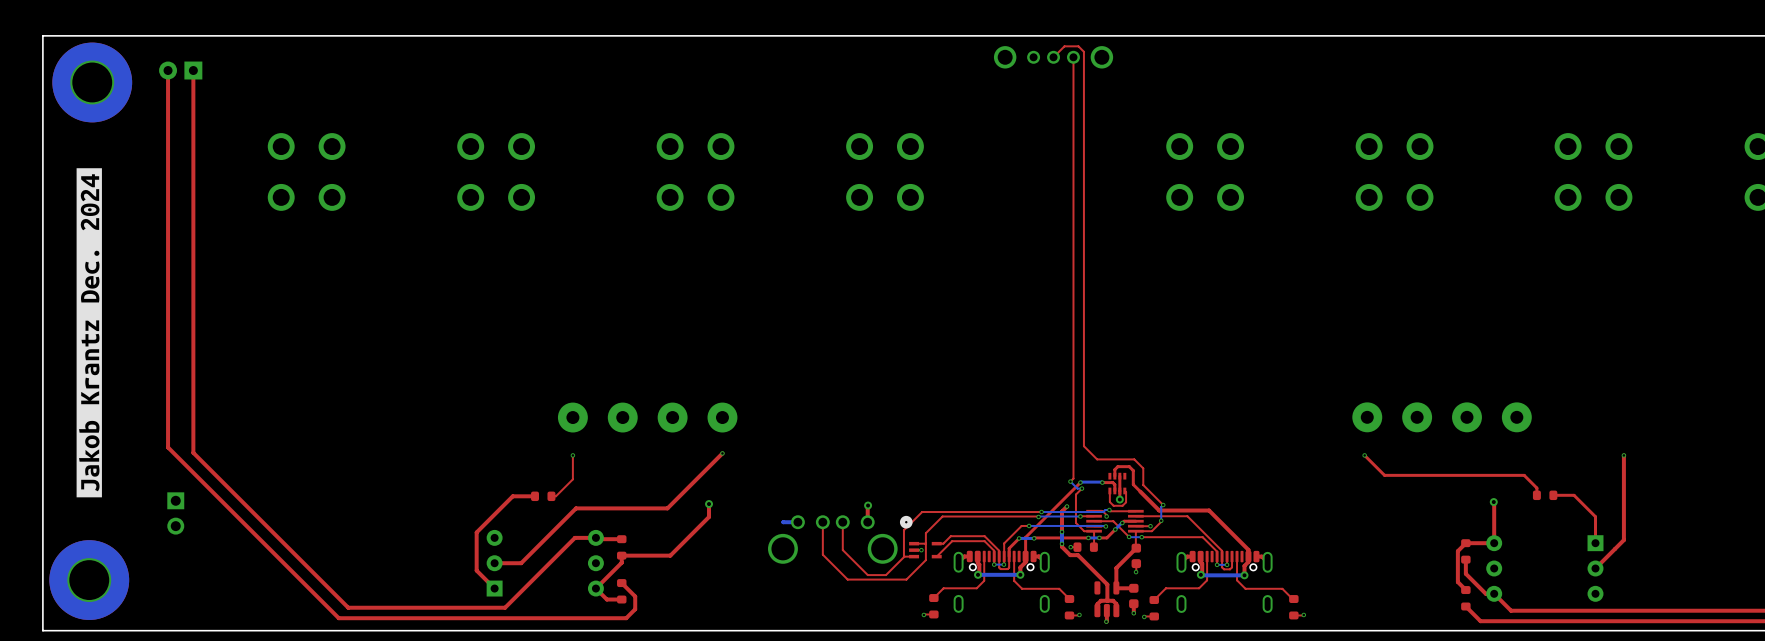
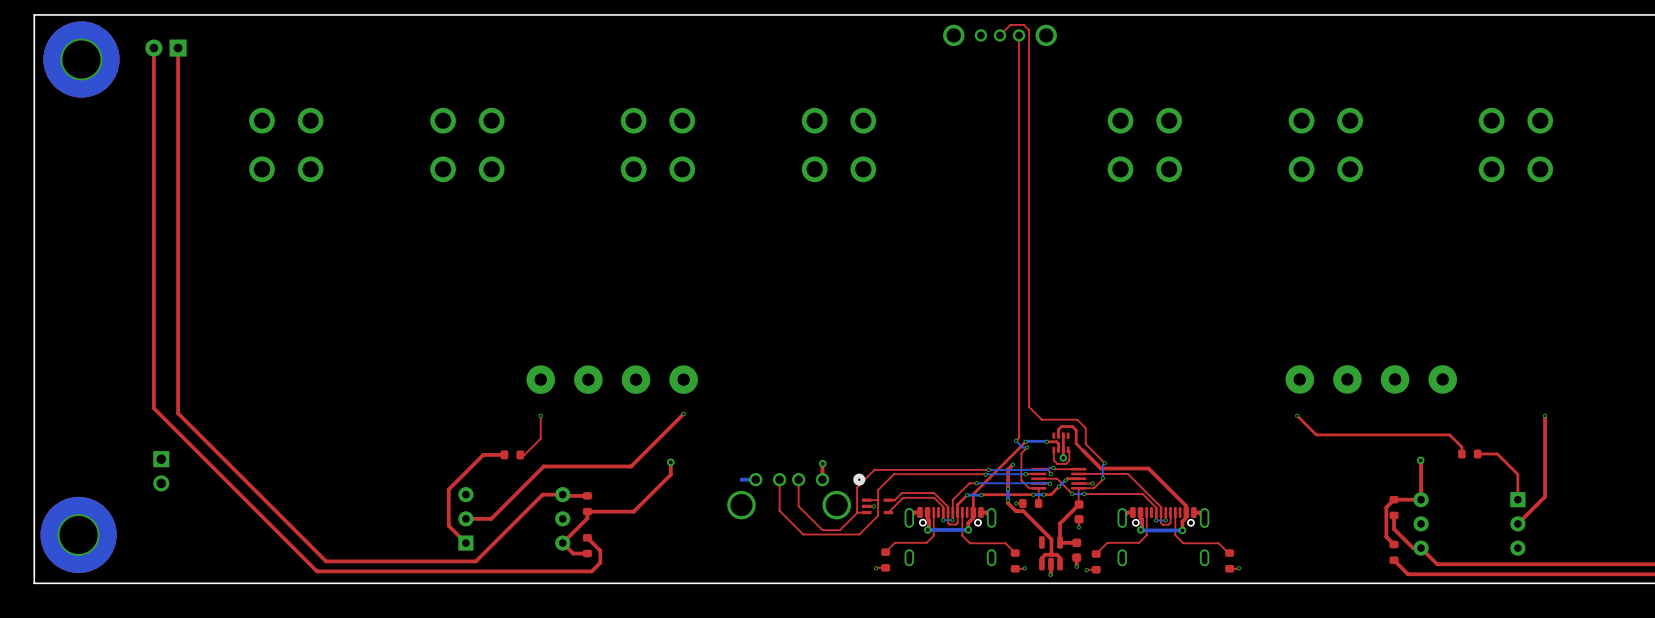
drawing: [76, 168, 102, 498] -> none

